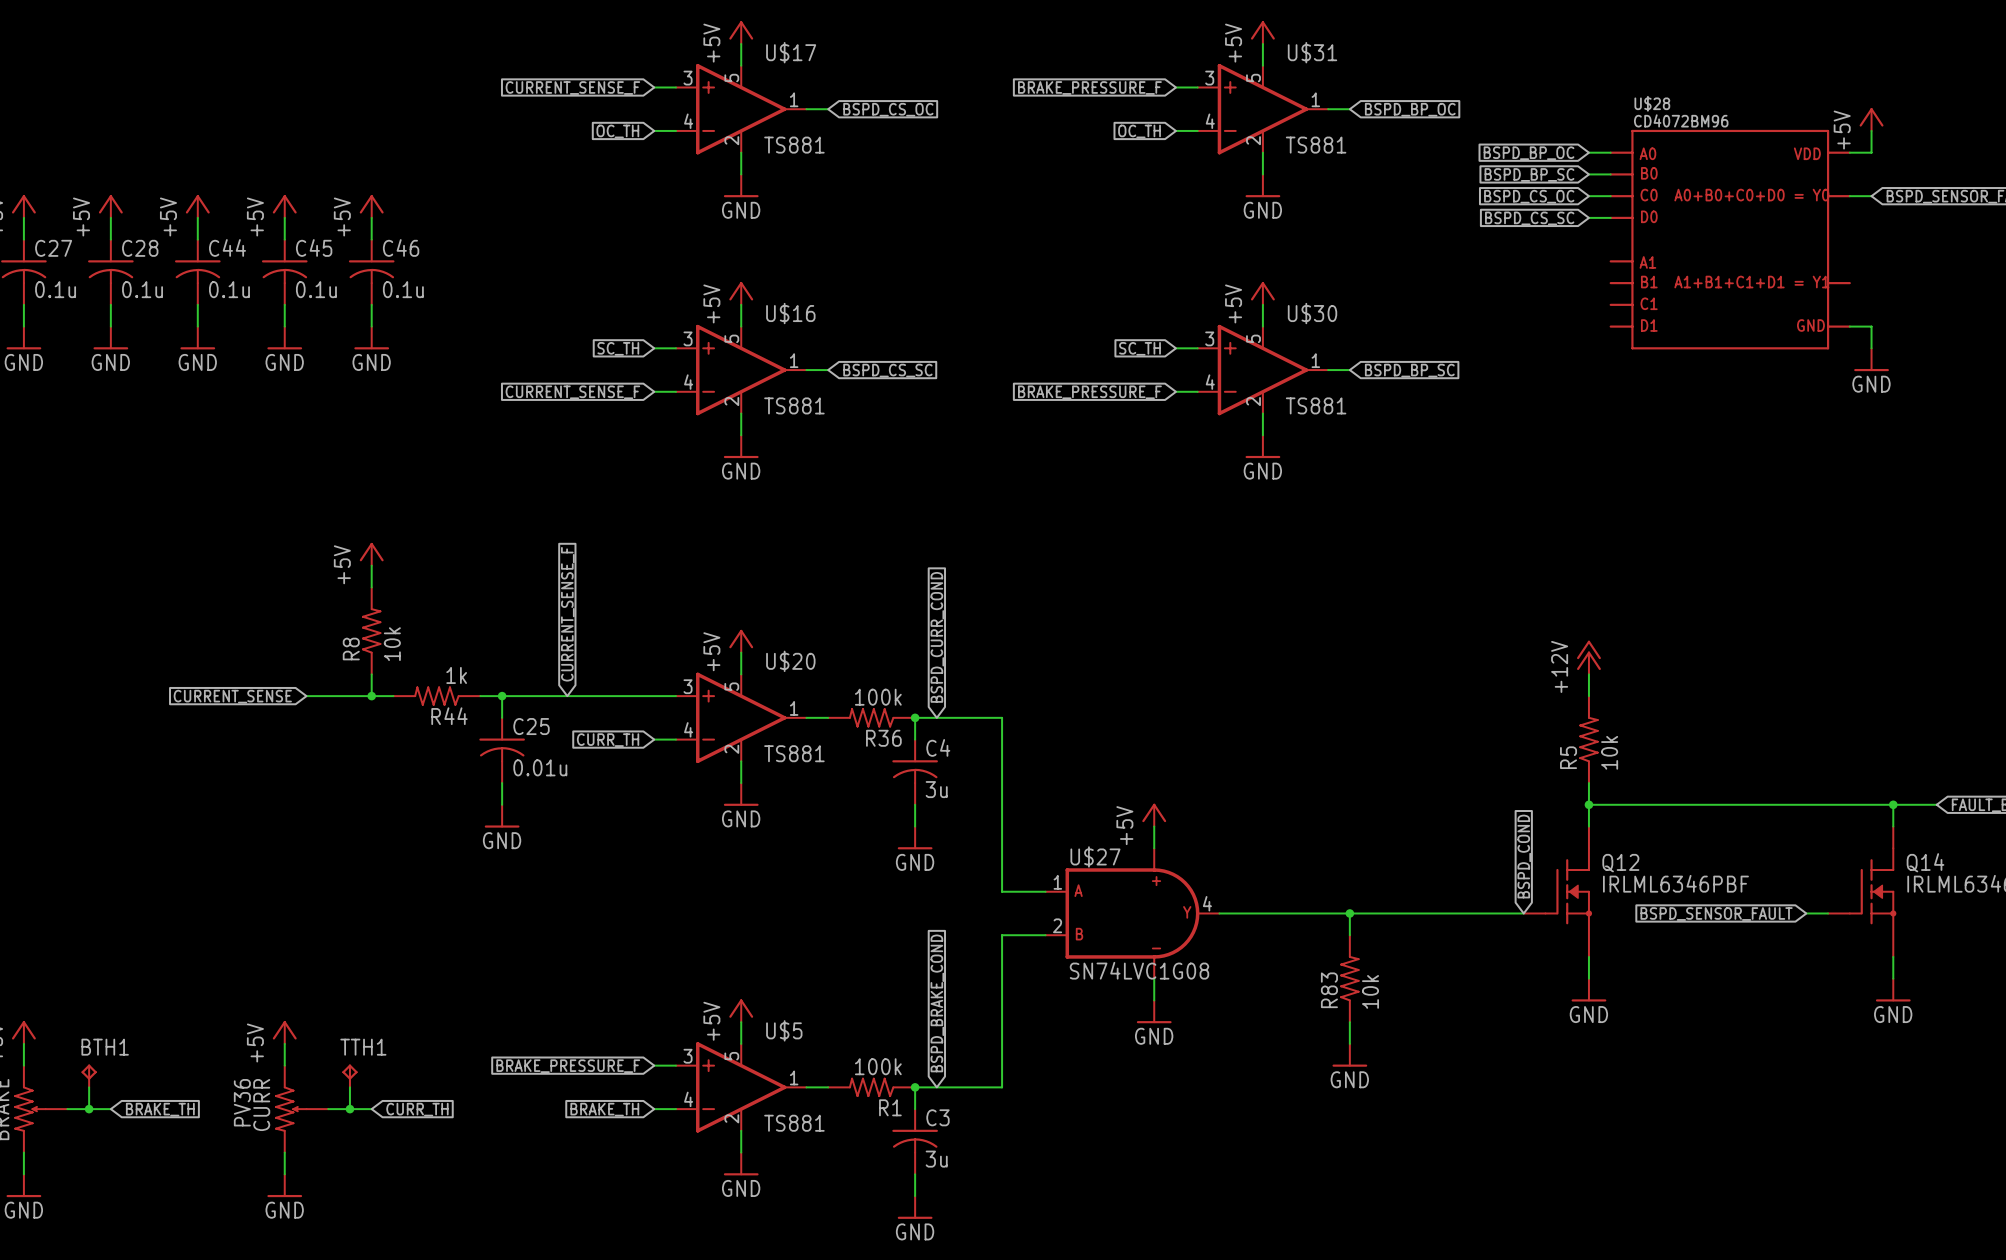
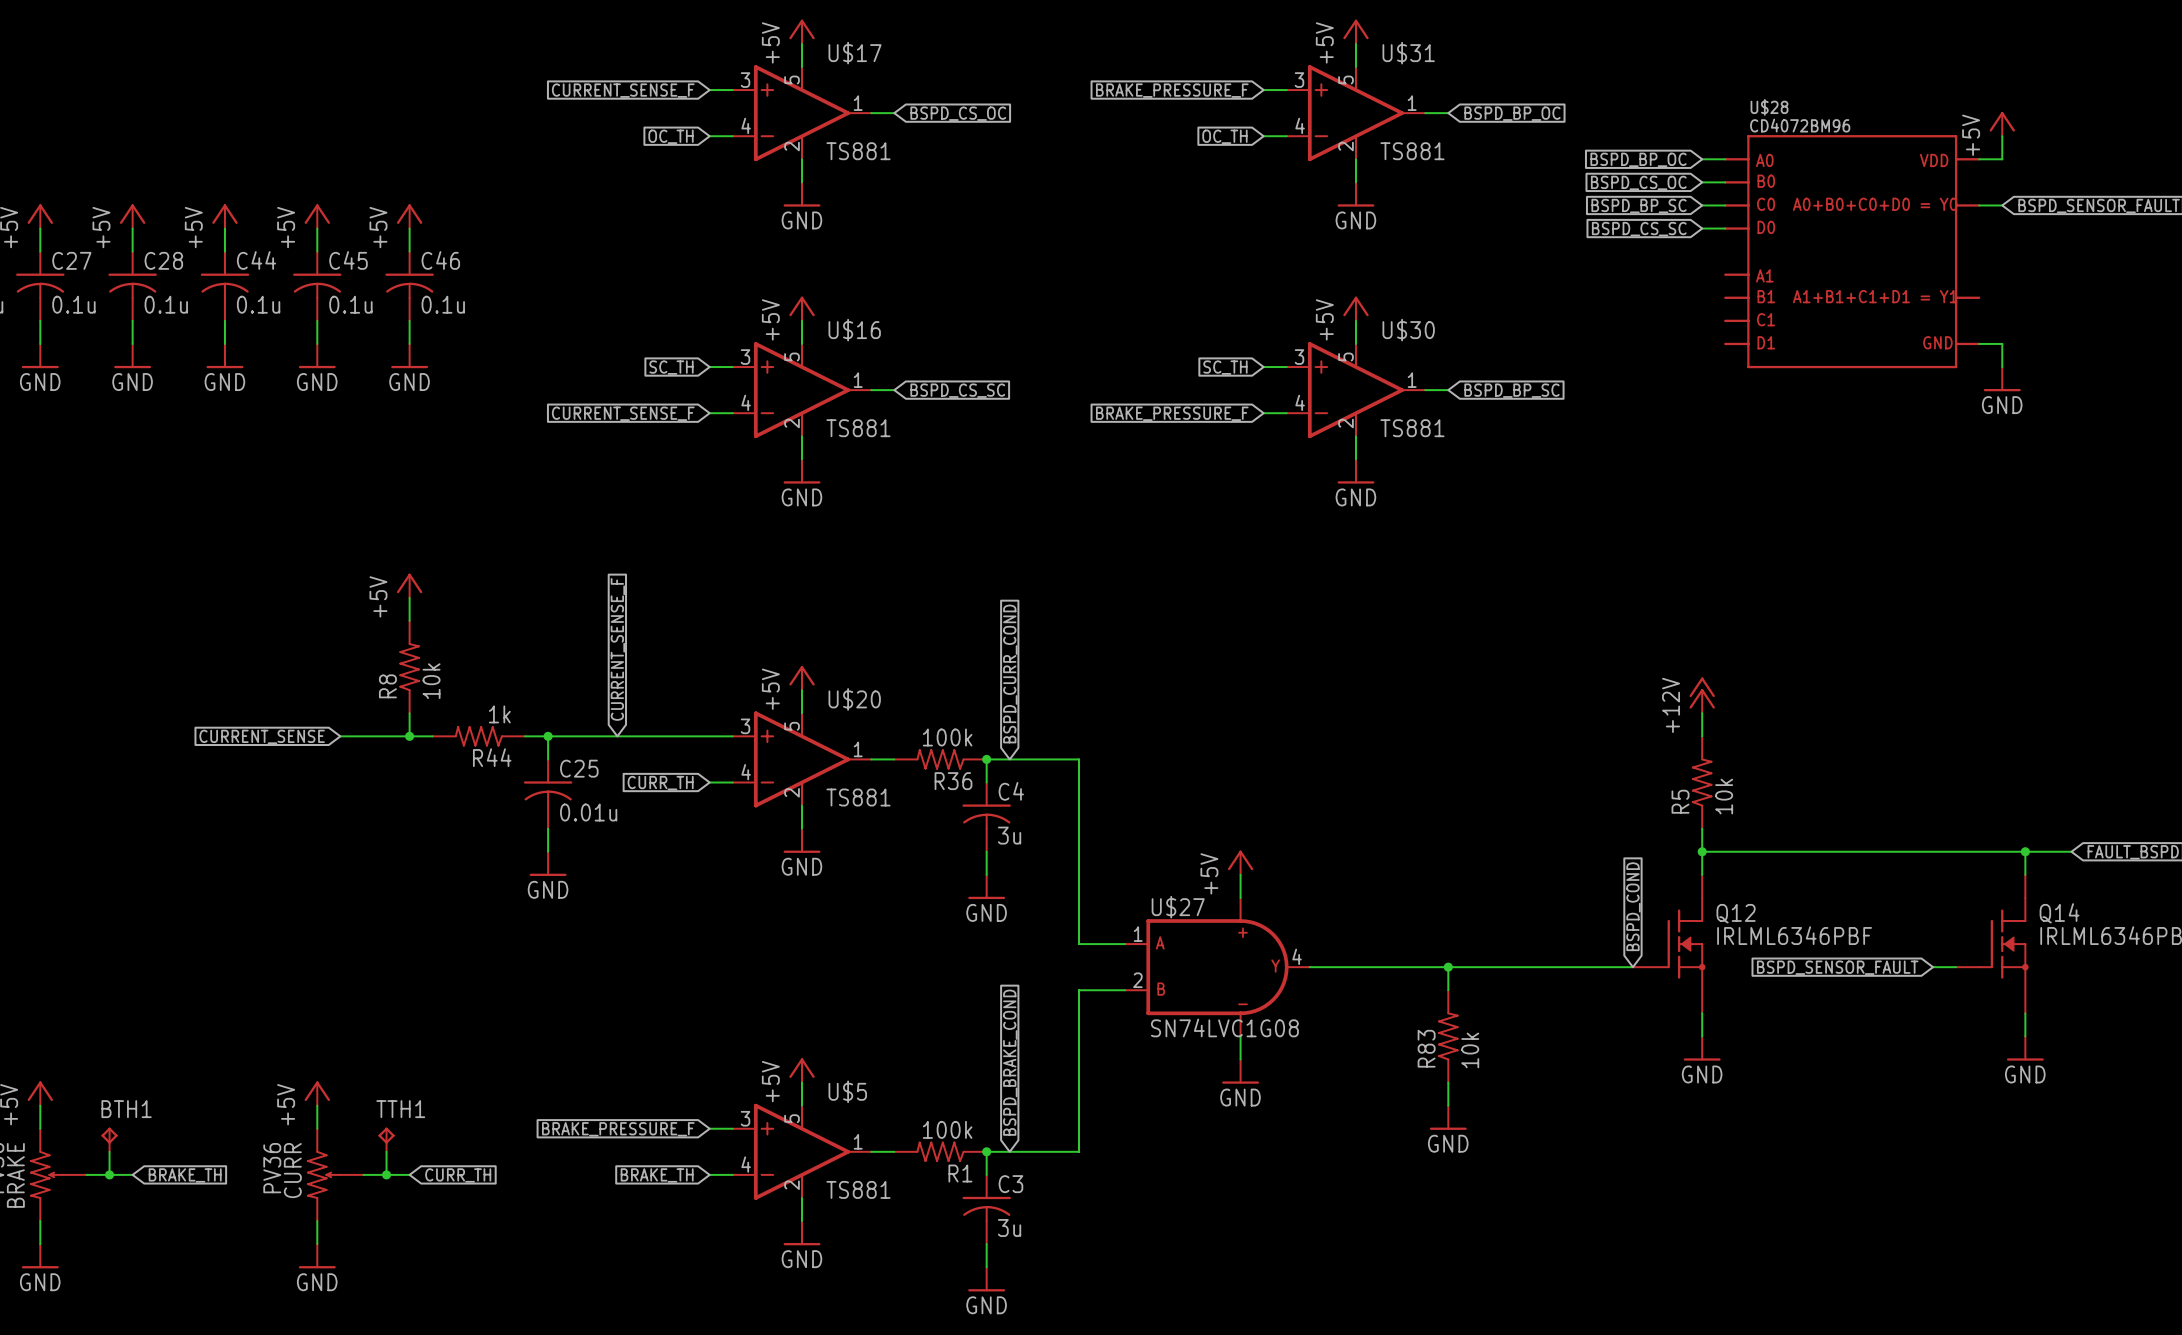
global label: BSPD_BP_SC (1529, 174) -> BSPD_CS_OC (1638, 182)
global label: BSPD_CS_OC (1529, 196) -> BSPD_BP_SC (1639, 206)

